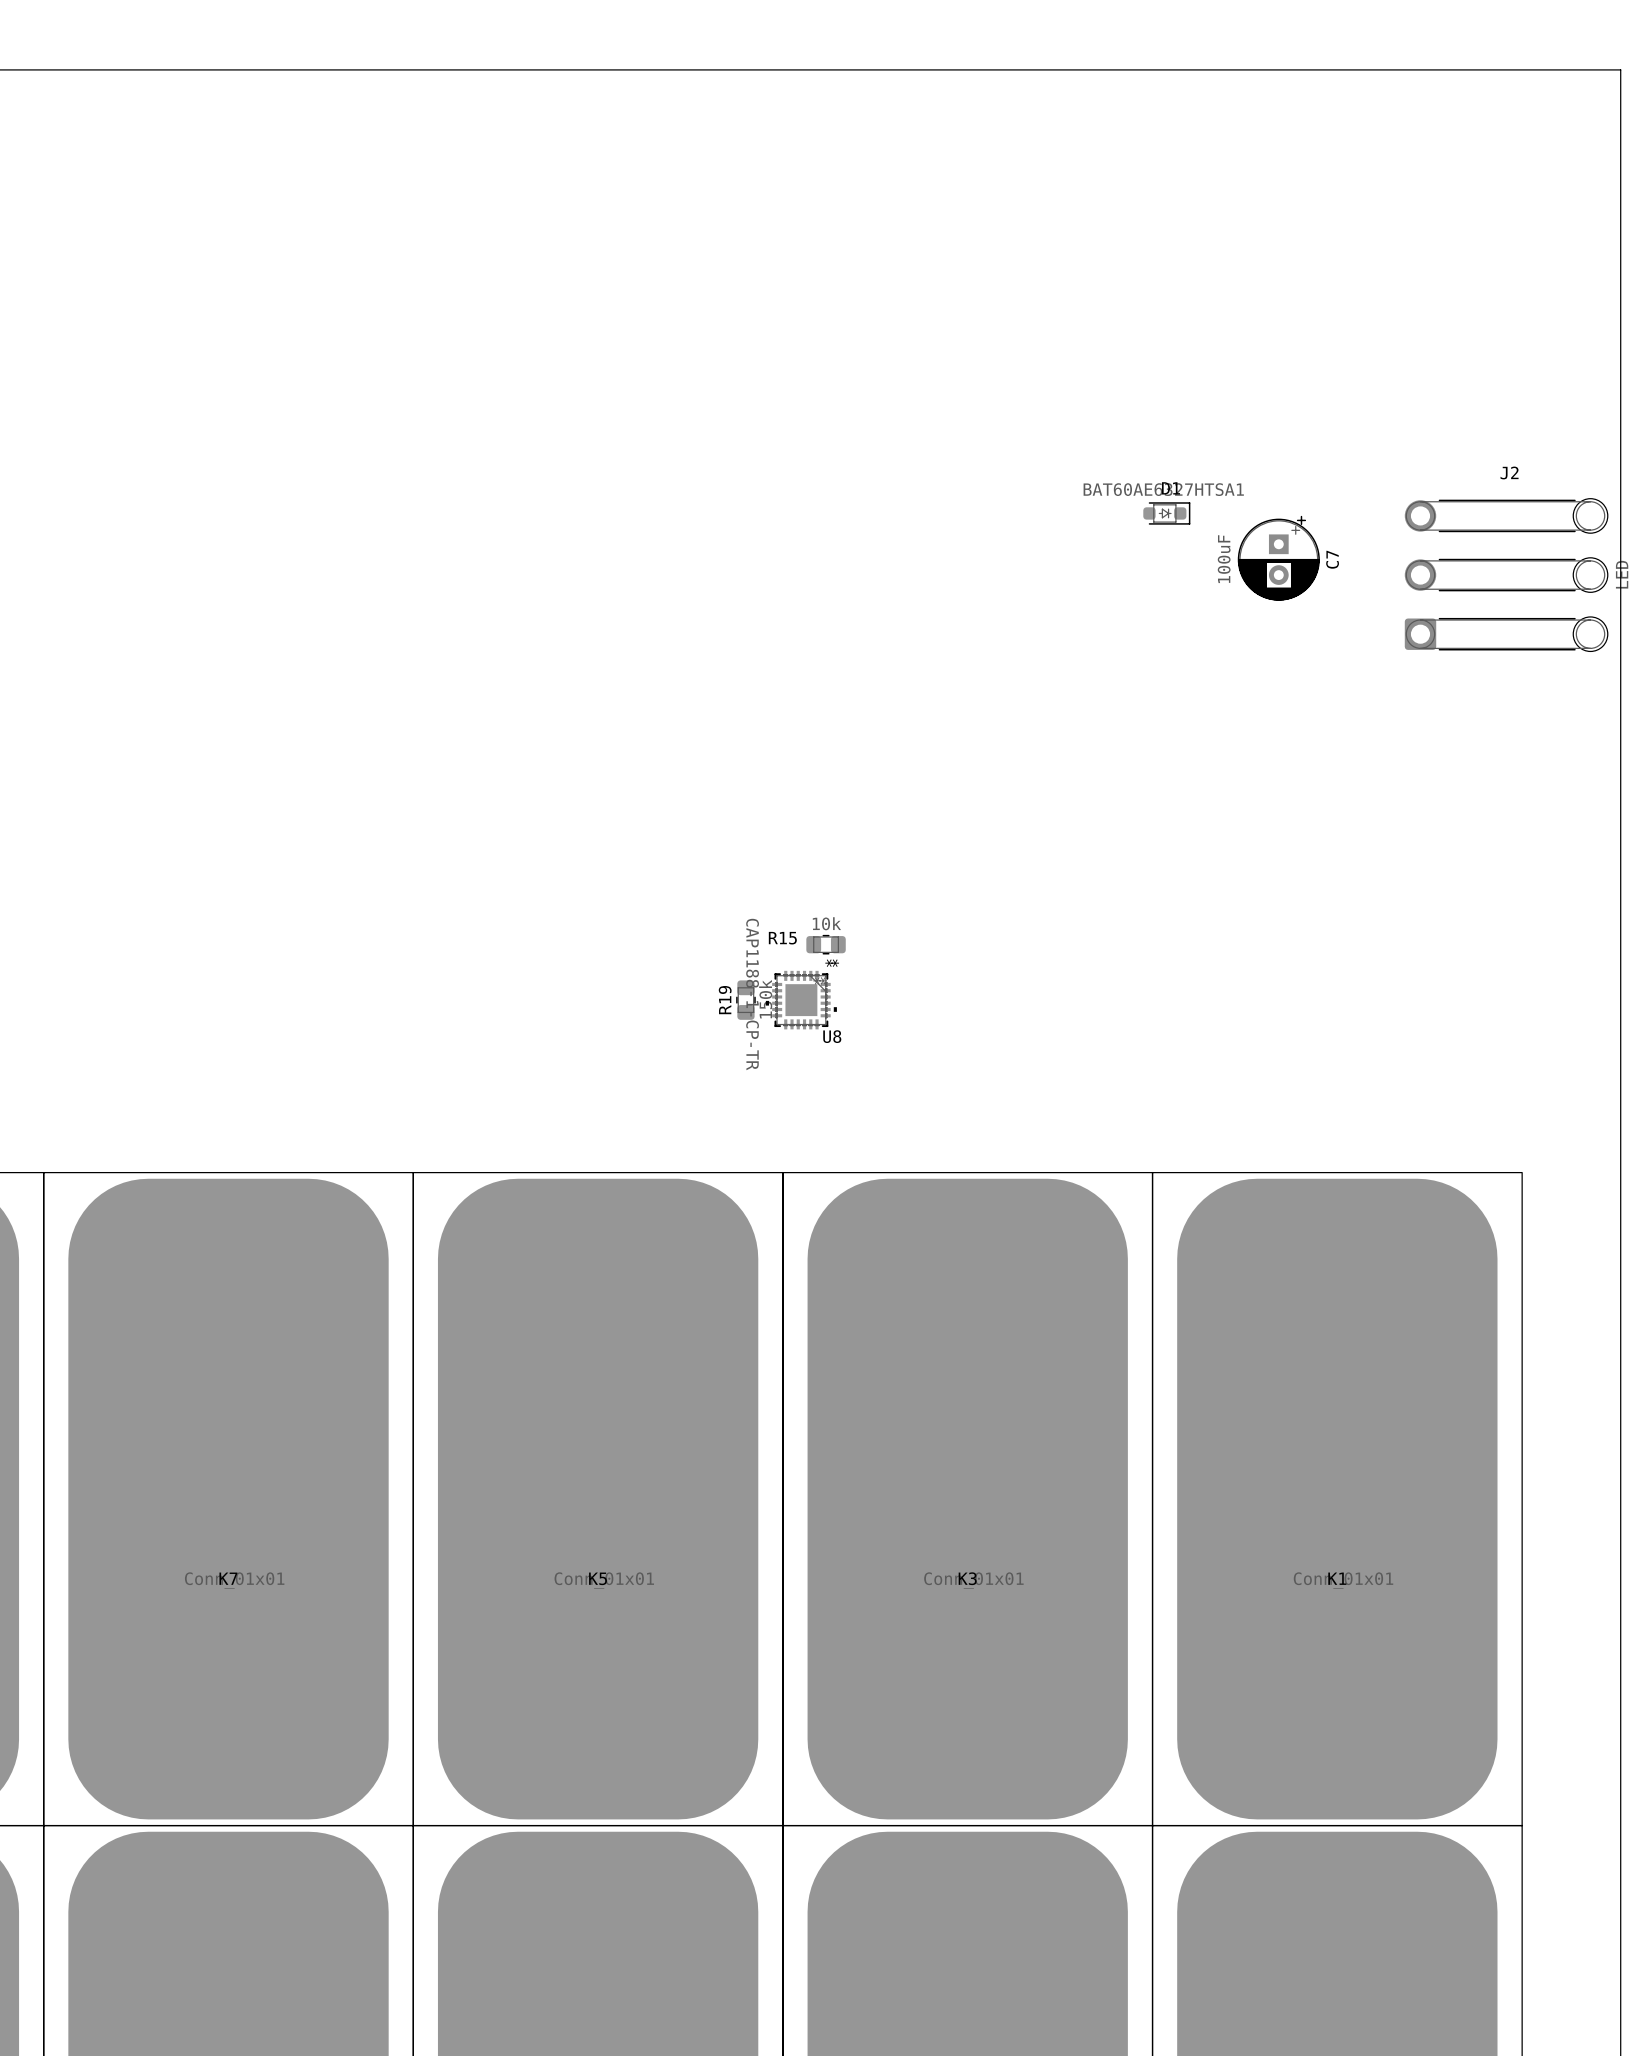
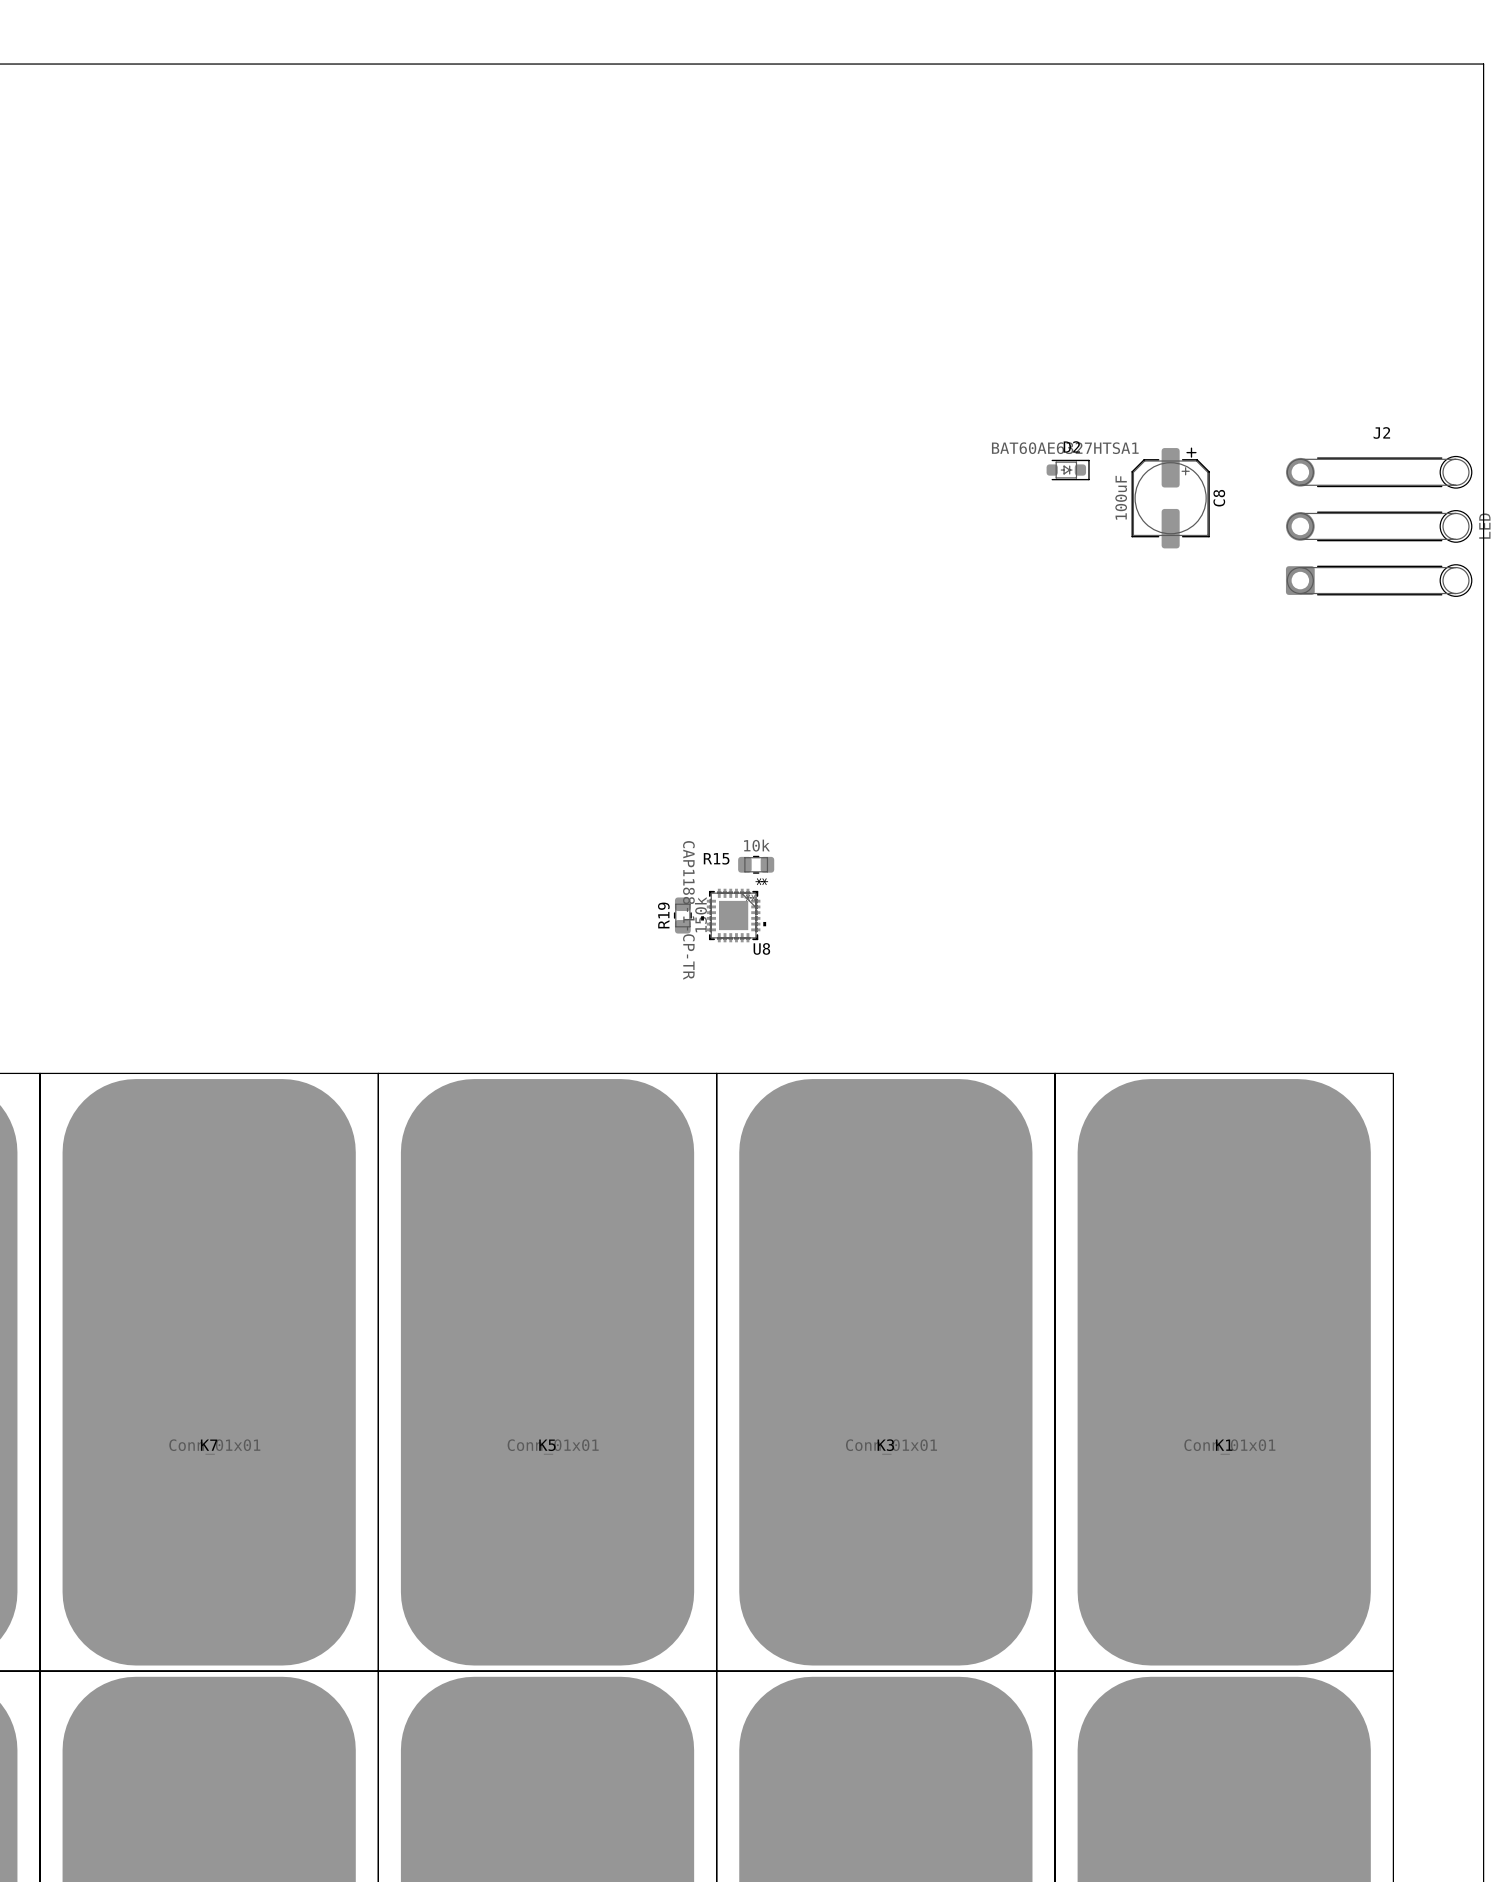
D1 name: D1 (1171, 488) -> D2 (1071, 446)
C8: none -> 100uF (1170, 497)
C7: 100uF (1278, 558) -> none

